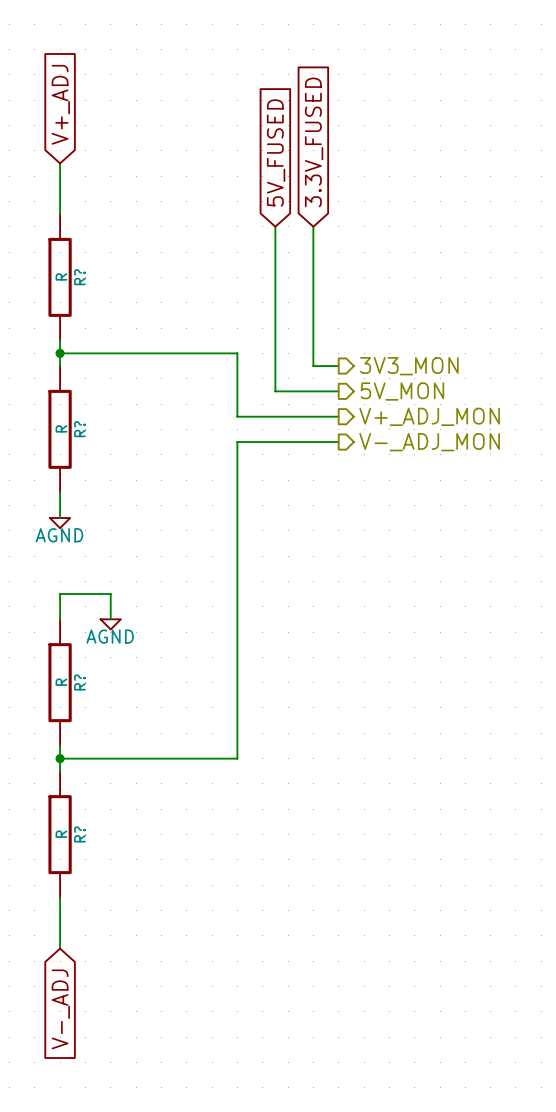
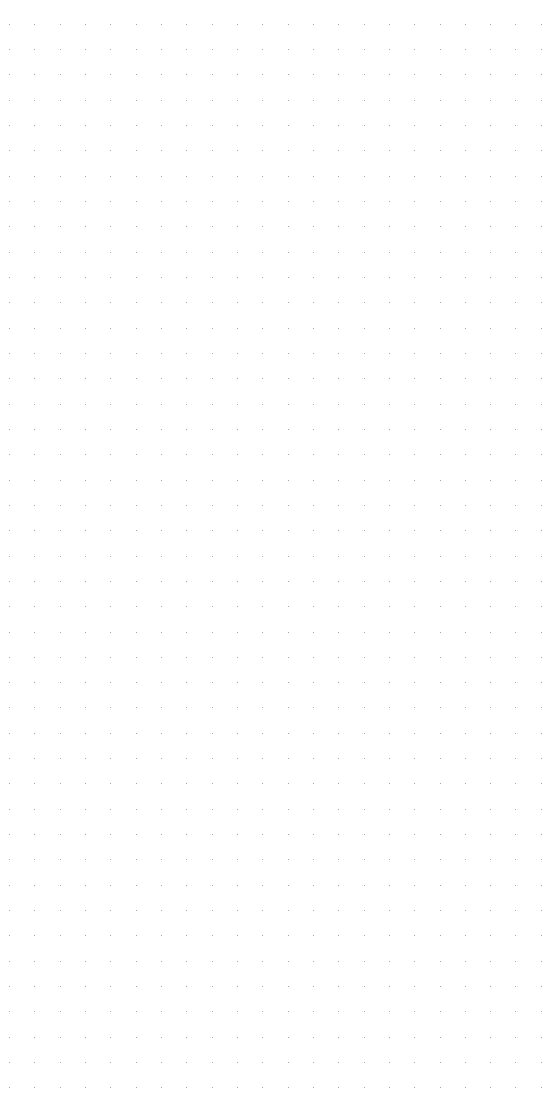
global label: V+_ADJ (60, 104) -> none
global label: 3.3V_FUSED (314, 142) -> none
global label: 5V_FUSED (276, 152) -> none
wire: (60, 163) (60, 214) -> none
wire: (275, 226) (275, 391) (338, 391) -> none
wire: (313, 226) (313, 366) (338, 366) -> none
R?: R (60, 277) -> none
wire: (60, 340) (60, 366) -> none
wire: (60, 353) (237, 353) (237, 416) (338, 416) -> none
junction: (60, 353) -> none
hierarchical label: 3V3_MON (409, 366) -> none
hierarchical label: 5V_MON (402, 391) -> none
hierarchical label: V+_ADJ_MON (429, 416) -> none
R?: R (60, 429) -> none
wire: (338, 442) (237, 442) (237, 758) (60, 758) -> none
hierarchical label: V-_ADJ_MON (429, 442) -> none
wire: (60, 492) (60, 518) -> none
power symbol: AGND (60, 523) -> none
wire: (60, 619) (60, 594) (110, 594) (110, 619) -> none
power symbol: AGND (110, 624) -> none
R?: R (60, 682) -> none
wire: (60, 745) (60, 771) -> none
junction: (60, 758) -> none
R?: R (60, 834) -> none
wire: (60, 897) (60, 948) -> none
global label: V-_ADJ (60, 1009) -> none

